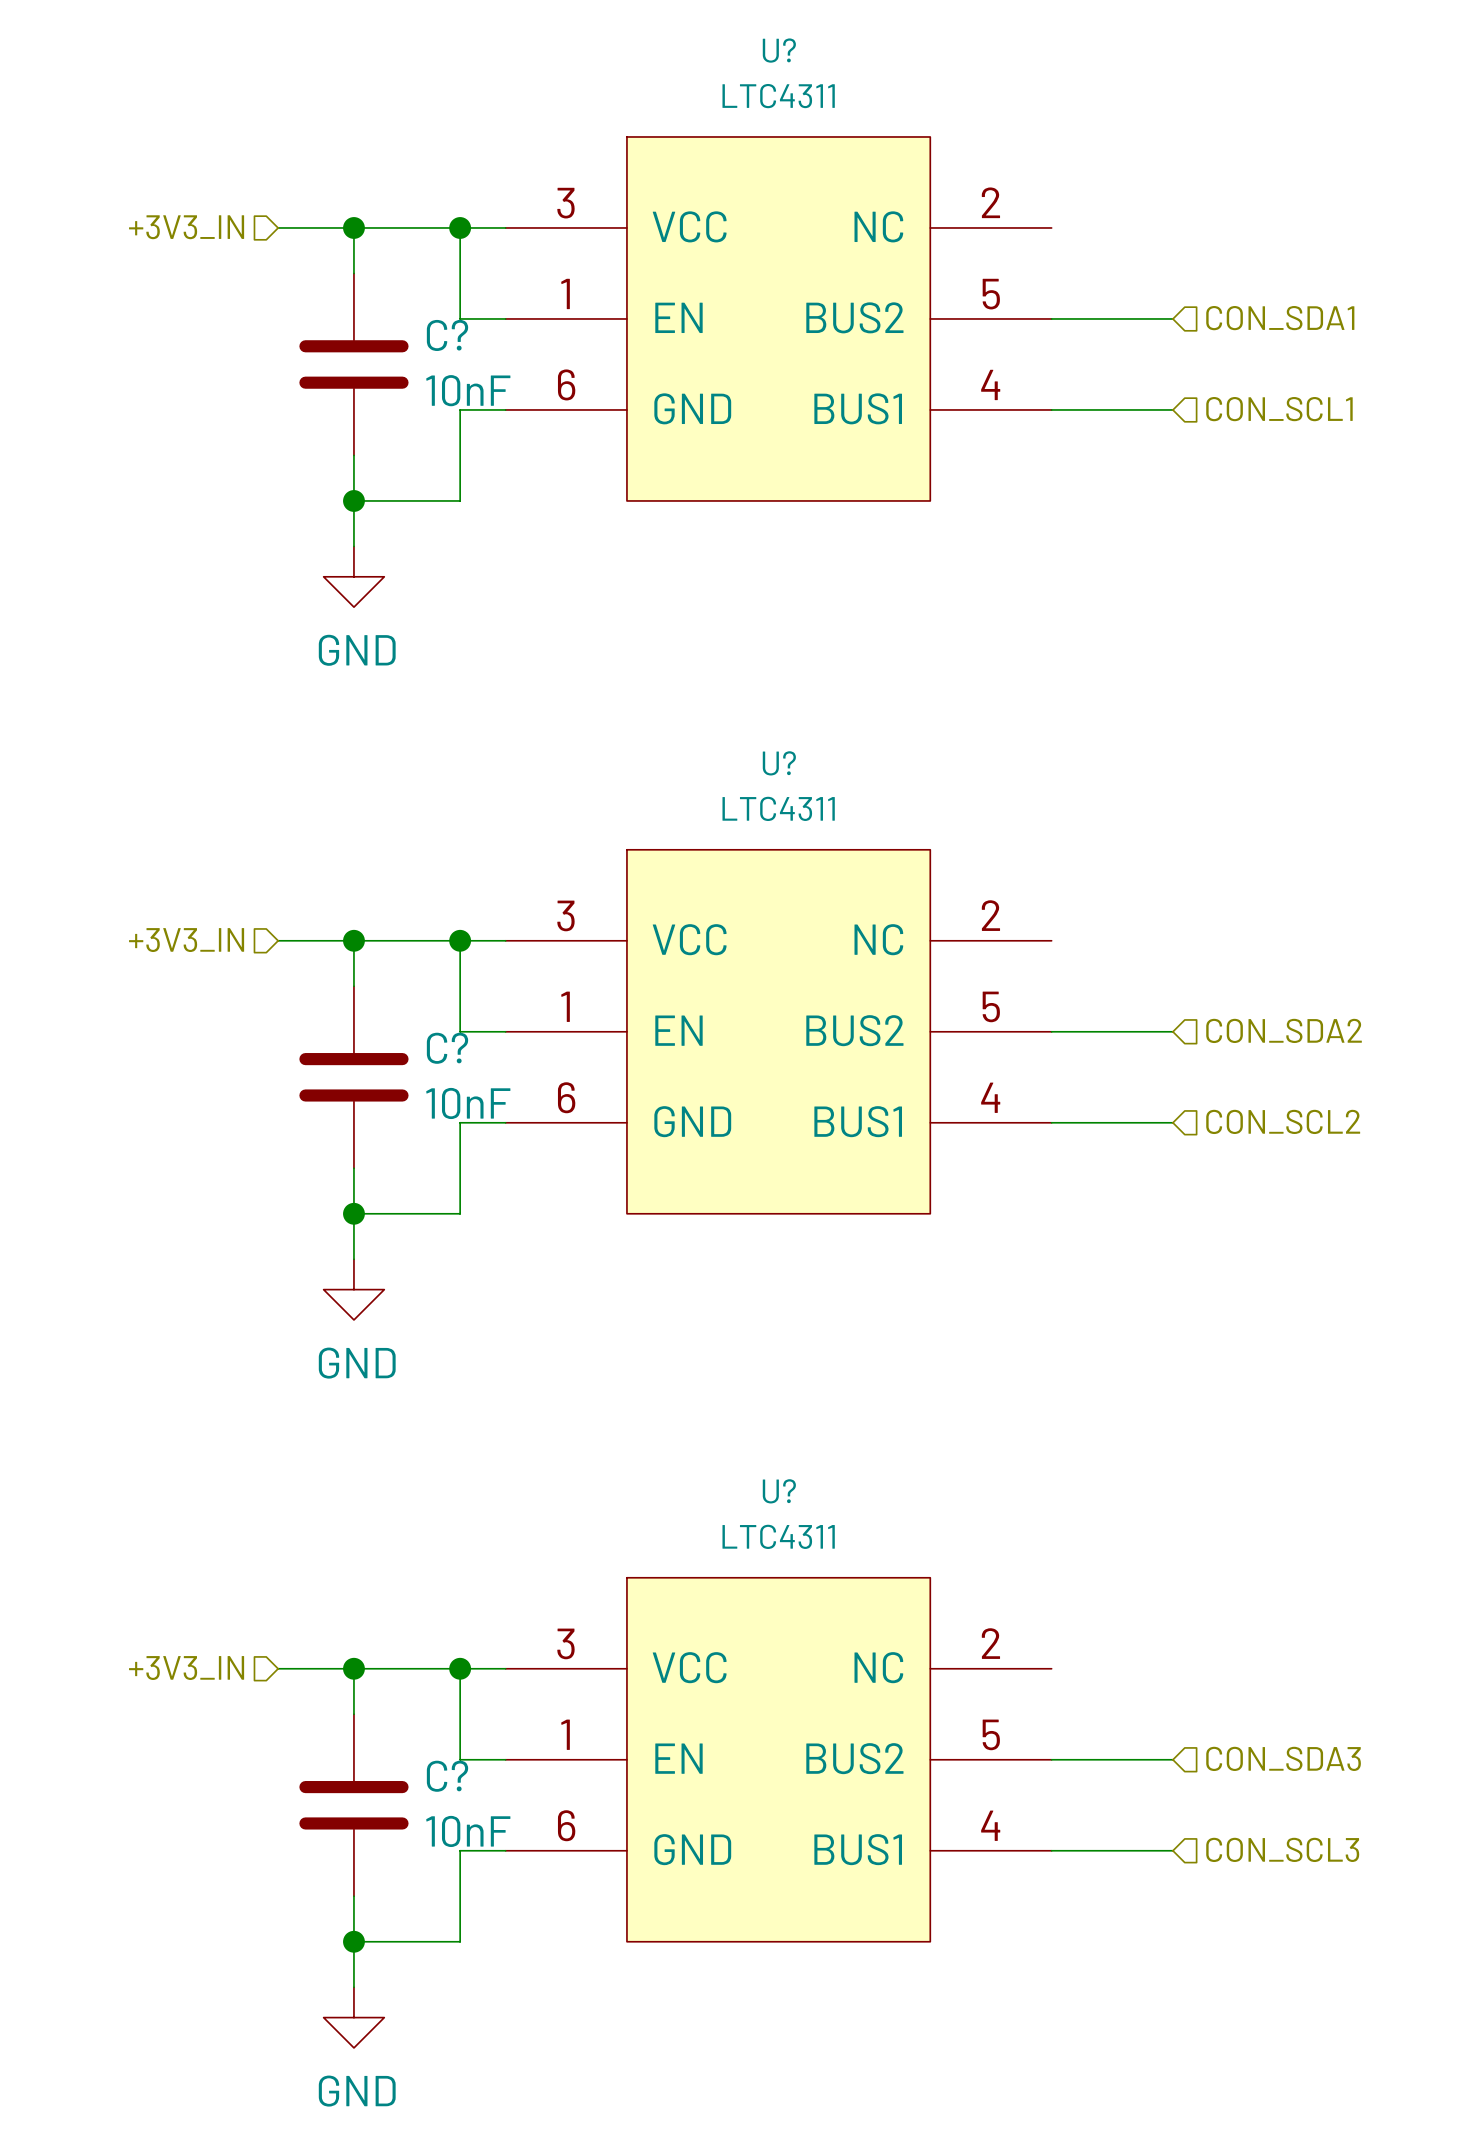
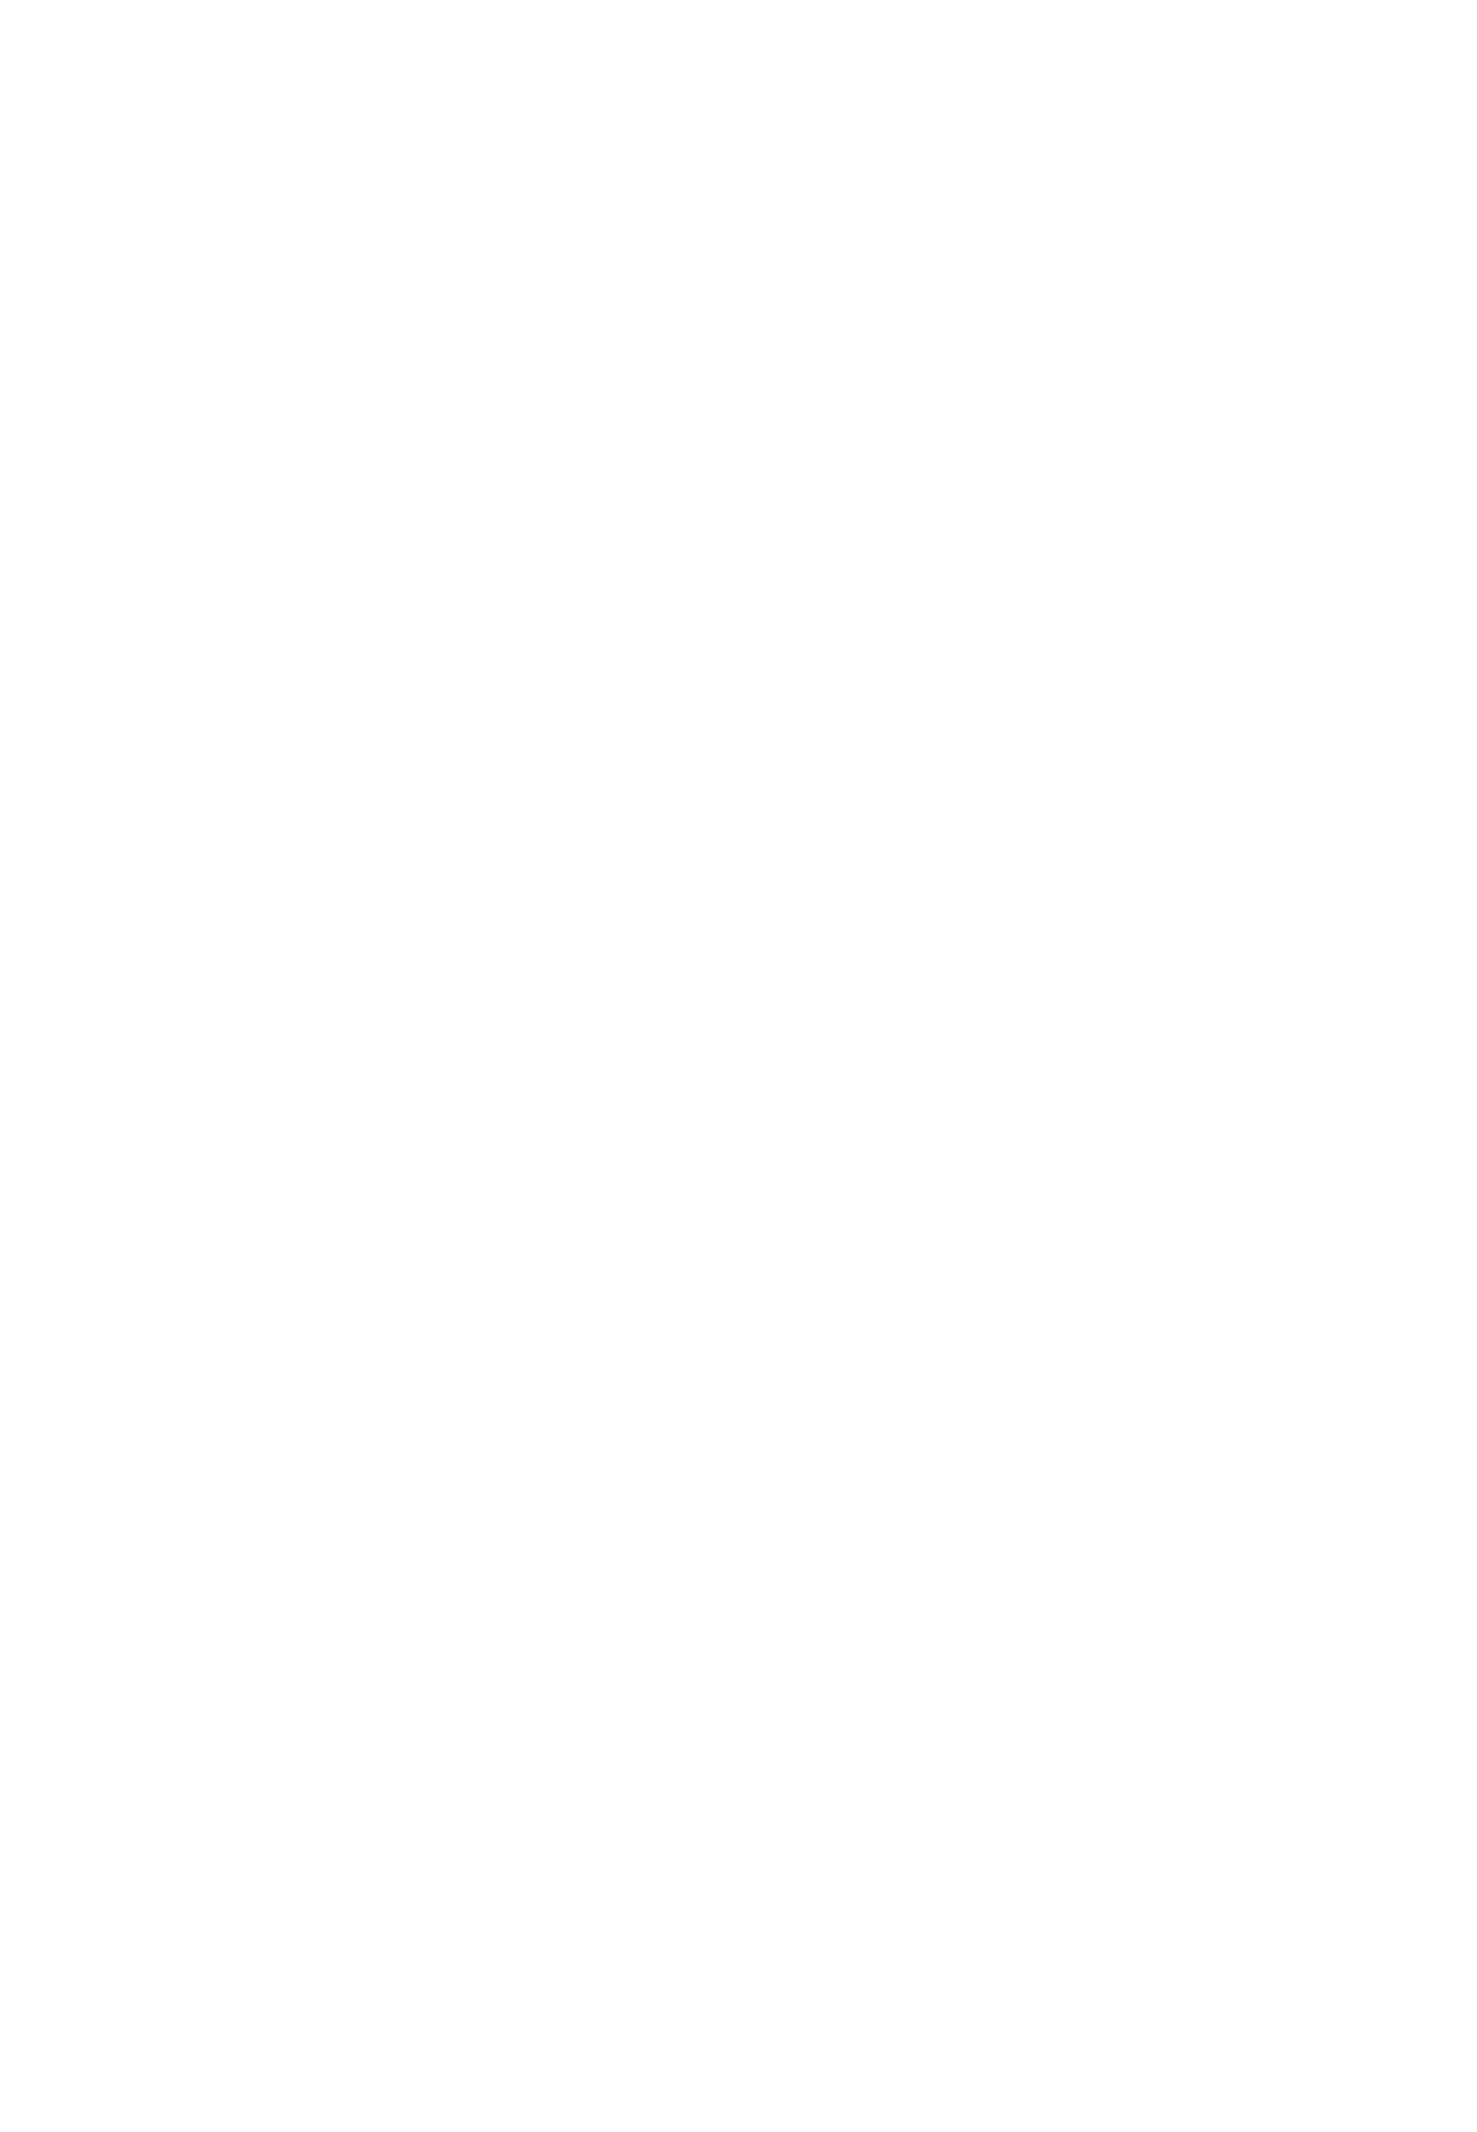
hierarchical label: +3V3_IN (186, 227) -> none
wire: (278, 227) (505, 227) -> none
wire: (353, 227) (353, 273) -> none
junction: (353, 227) -> none
wire: (460, 227) (460, 318) (505, 318) -> none
junction: (460, 227) -> none
U?: LTC4311 (778, 318) -> none
wire: (1051, 318) (1172, 318) -> none
hierarchical label: CON_SDA1 (1280, 318) -> none
C?: 10nF (353, 364) -> none
wire: (505, 409) (460, 409) (460, 500) (353, 500) -> none
wire: (1051, 409) (1172, 409) -> none
hierarchical label: CON_SCL1 (1279, 409) -> none
wire: (353, 455) (353, 546) -> none
junction: (353, 500) -> none
power symbol: GND (353, 576) -> none
hierarchical label: +3V3_IN (186, 940) -> none
wire: (278, 940) (505, 940) -> none
wire: (353, 940) (353, 986) -> none
junction: (353, 940) -> none
wire: (460, 940) (460, 1031) (505, 1031) -> none
junction: (460, 940) -> none
hierarchical label: CON_SDA2 (1284, 1030) -> none
U?: LTC4311 (778, 1031) -> none
wire: (1051, 1031) (1172, 1031) -> none
C?: 10nF (353, 1077) -> none
hierarchical label: CON_SCL2 (1283, 1121) -> none
wire: (505, 1122) (460, 1122) (460, 1213) (353, 1213) -> none
wire: (1051, 1122) (1172, 1122) -> none
wire: (353, 1168) (353, 1259) -> none
junction: (353, 1213) -> none
power symbol: GND (353, 1289) -> none
hierarchical label: +3V3_IN (186, 1668) -> none
wire: (278, 1668) (505, 1668) -> none
wire: (353, 1668) (353, 1714) -> none
junction: (353, 1668) -> none
wire: (460, 1668) (460, 1759) (505, 1759) -> none
junction: (460, 1668) -> none
hierarchical label: CON_SDA3 (1283, 1758) -> none
U?: LTC4311 (778, 1759) -> none
wire: (1051, 1759) (1172, 1759) -> none
C?: 10nF (353, 1805) -> none
hierarchical label: CON_SCL3 (1282, 1849) -> none
wire: (505, 1850) (460, 1850) (460, 1941) (353, 1941) -> none
wire: (1051, 1850) (1172, 1850) -> none
wire: (353, 1896) (353, 1987) -> none
junction: (353, 1941) -> none
power symbol: GND (353, 2017) -> none

